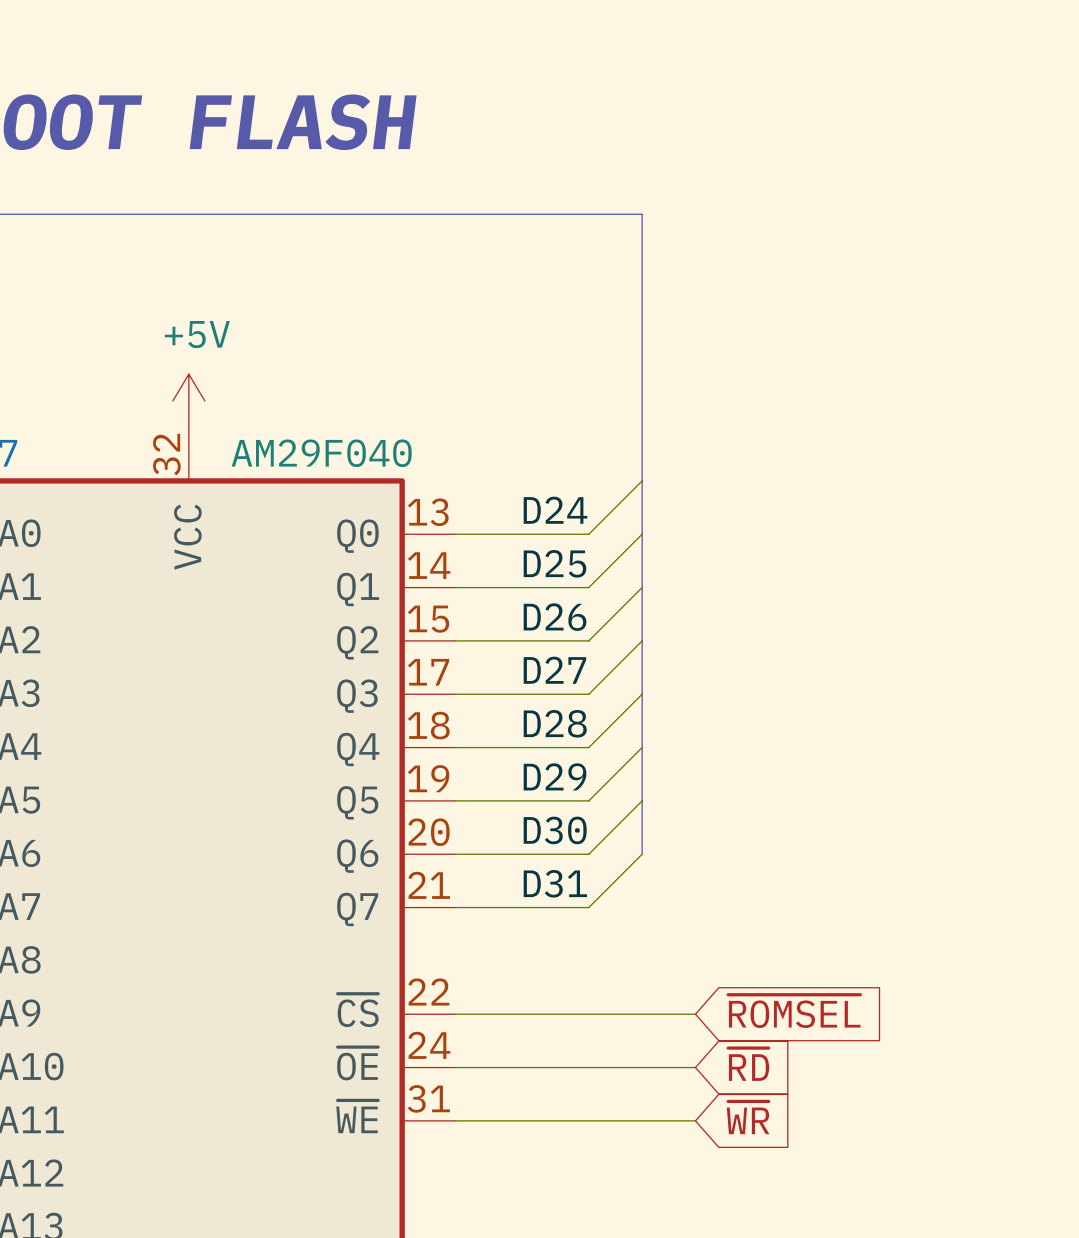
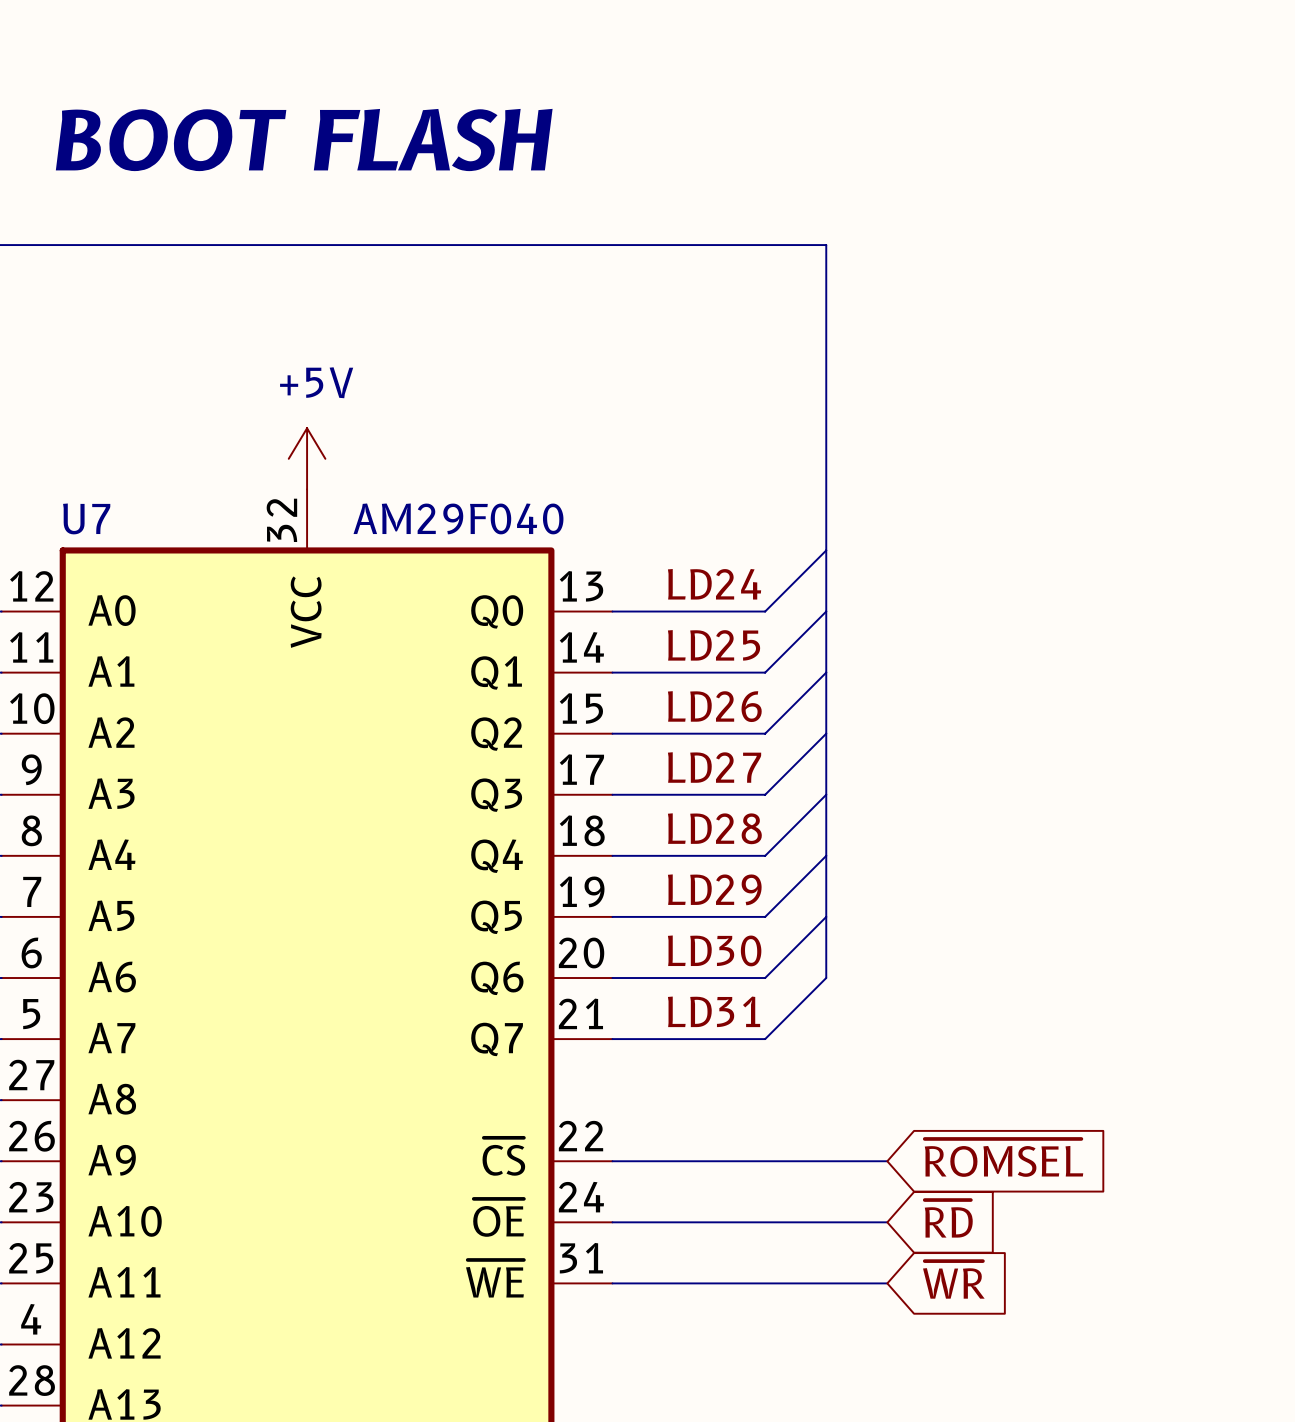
label: D24 (555, 510) -> LD24 (714, 584)
label: D25 (554, 563) -> LD25 (714, 645)
label: D26 (555, 617) -> LD26 (714, 706)
label: D27 (554, 670) -> LD27 (714, 767)
label: D28 (555, 723) -> LD28 (714, 828)
label: D29 (555, 776) -> LD29 (714, 889)
label: D30 (555, 830) -> LD30 (714, 950)
label: D31 (555, 883) -> LD31 (714, 1011)

